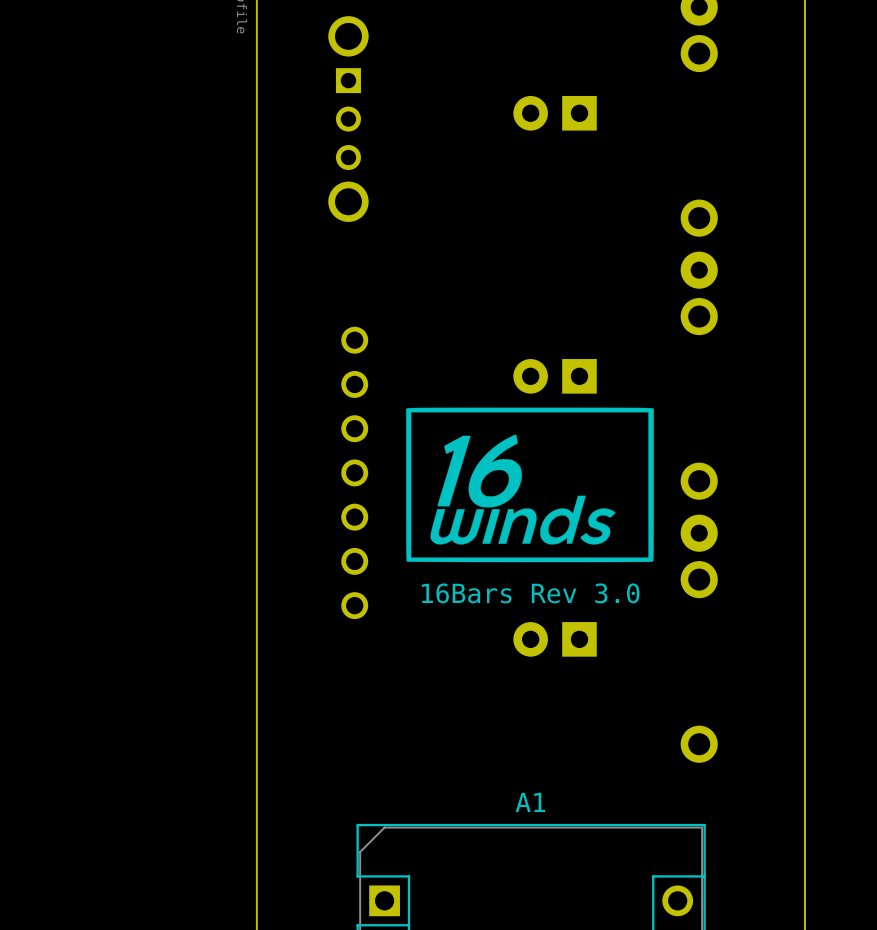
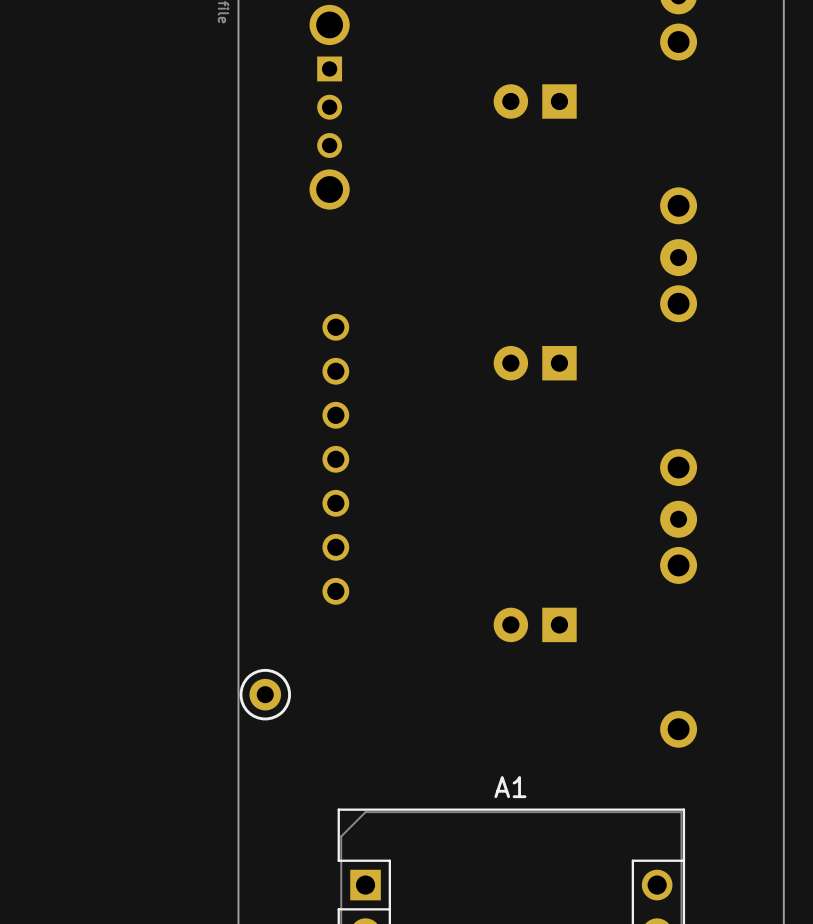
drawing: [406, 407, 654, 563] -> none
text: 16Bars Rev 3.0 (530, 593) -> none
part: none -> (265, 694)

